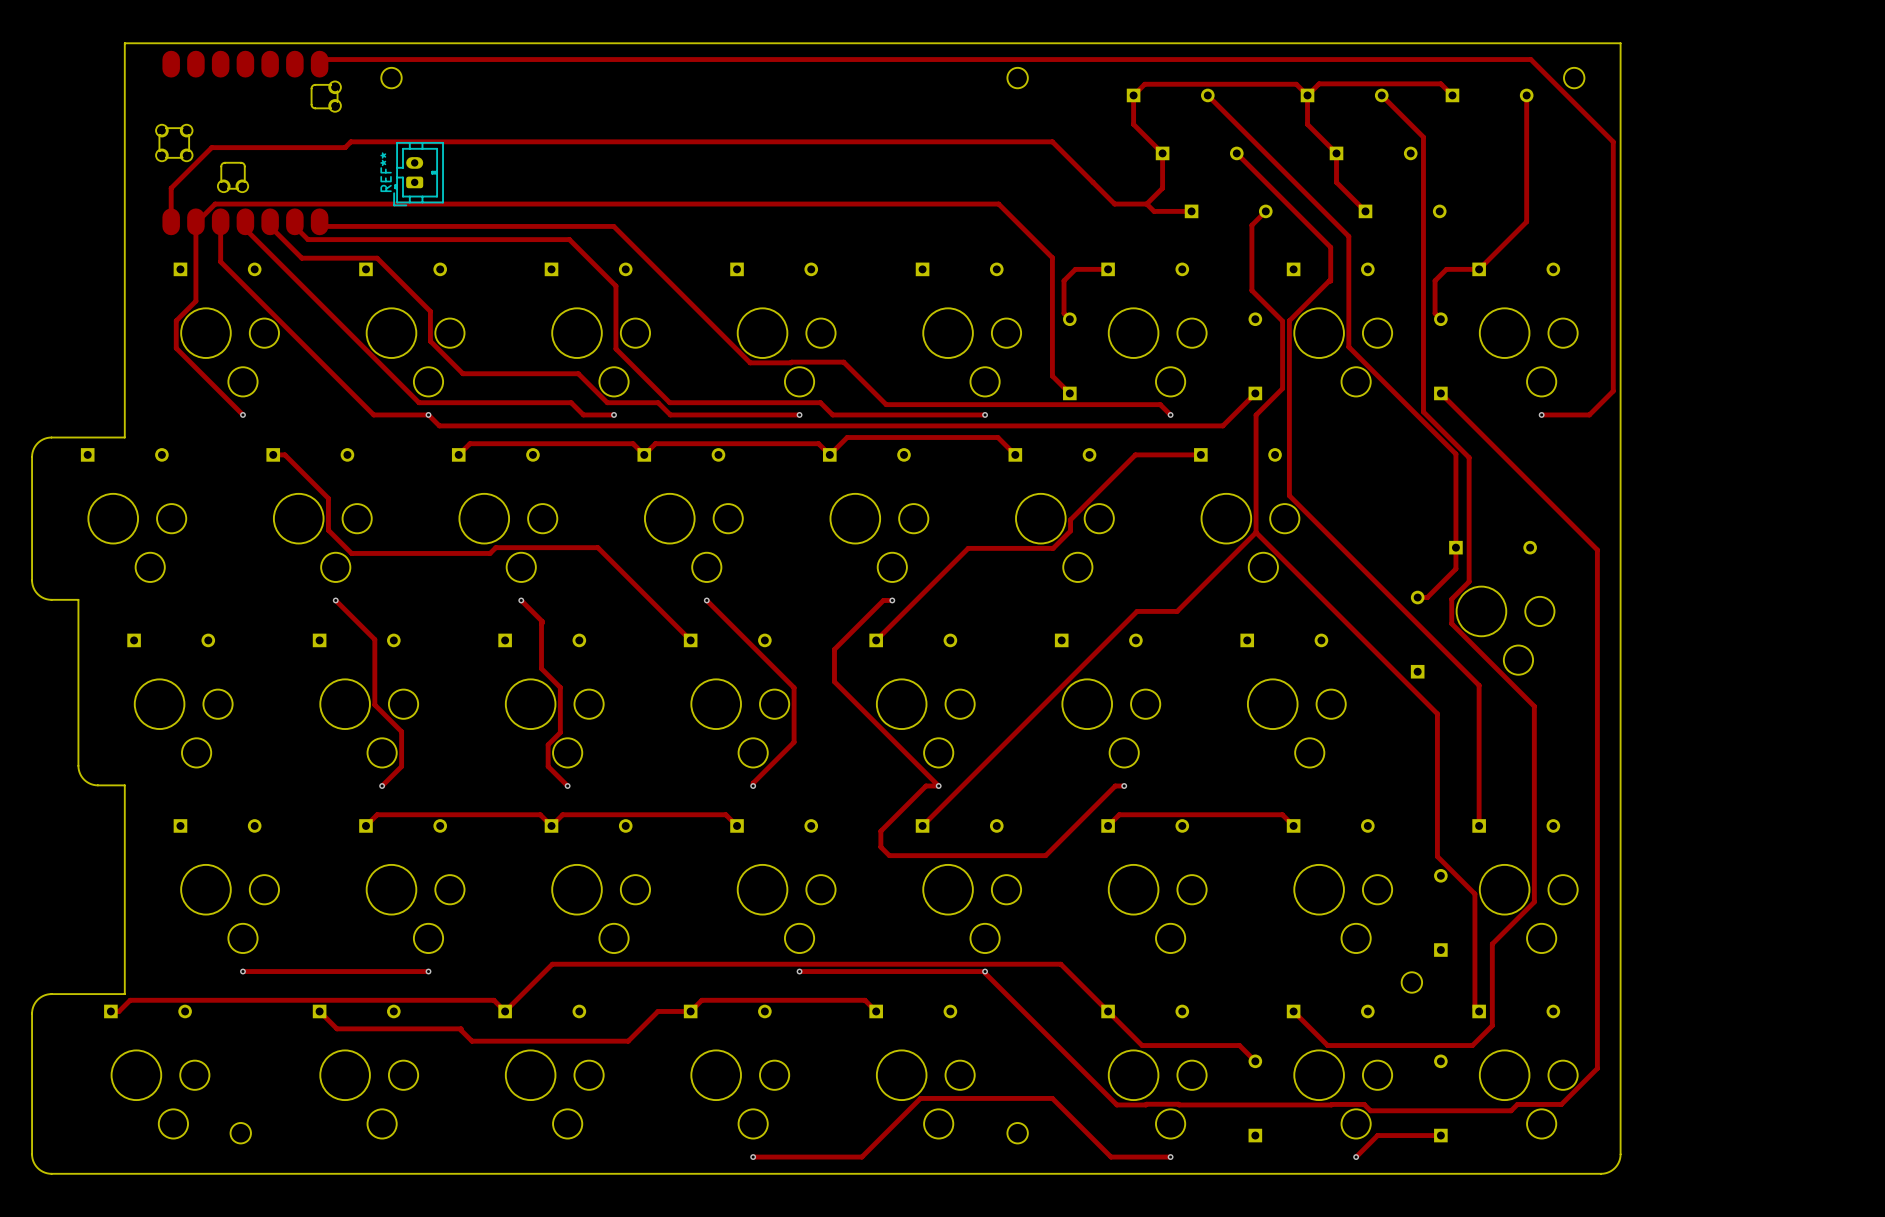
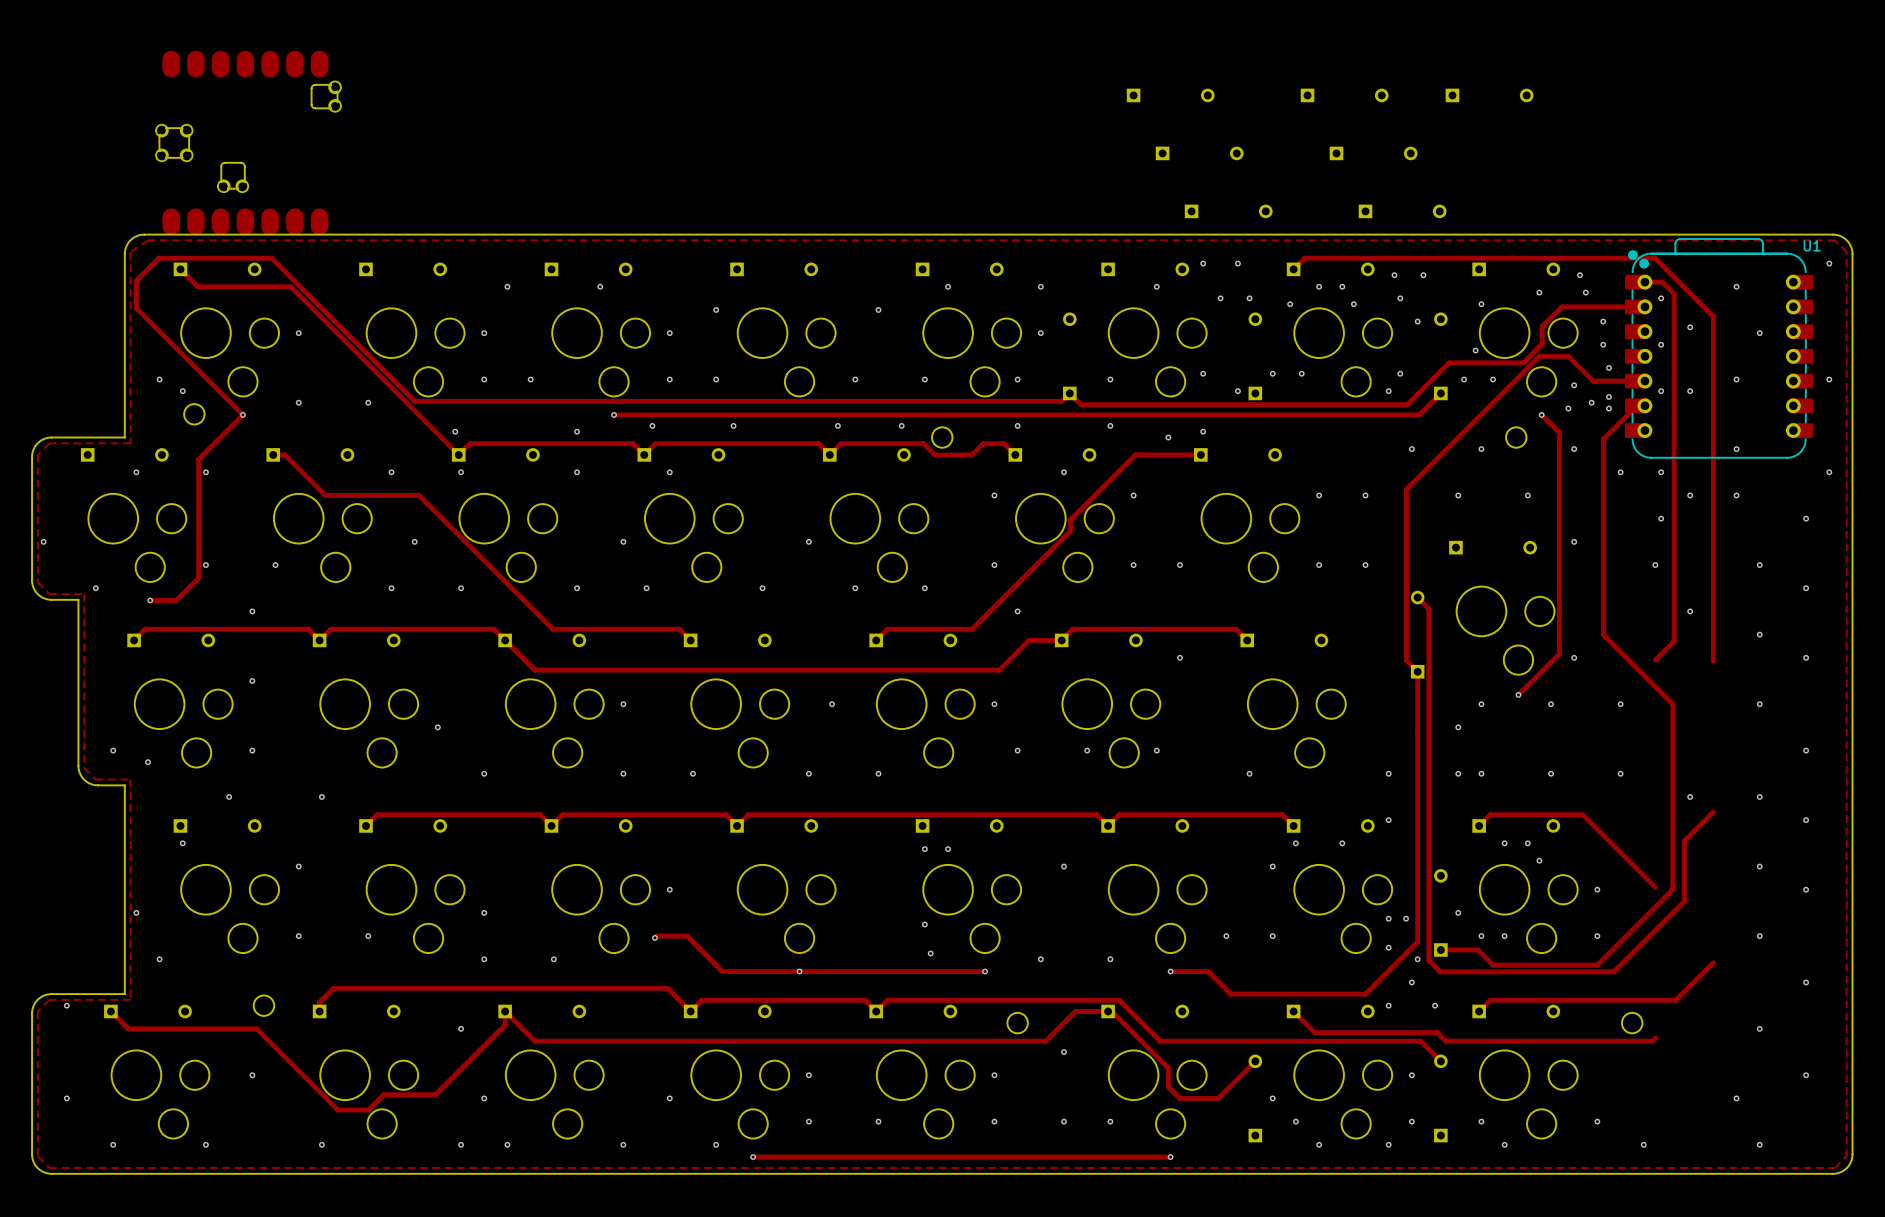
track: (319, 59) (1530, 59) (1613, 141) (1613, 391) (1589, 414) (1541, 414) -> (1518, 694) (1559, 654) (1559, 432) (1541, 414)
round board edge: [381, 67, 402, 89] -> none
round board edge: [1007, 67, 1029, 89] -> none
round board edge: [1563, 67, 1585, 89] -> none
track: (1207, 95) (1348, 236) (1348, 346) (1455, 454) (1455, 568) (1427, 597) (1417, 597) -> (1713, 812) (1684, 841) (1684, 901) (1613, 971) (1440, 971) (1428, 960) (1428, 608) (1417, 597)
track: (1307, 95) (1319, 83) (1440, 83) (1452, 95) -> none
track: (1307, 95) (1296, 84) (1144, 84) (1133, 95) (1133, 124) (1162, 153) (1162, 188) (1146, 204) -> none
track: (1307, 95) (1307, 124) (1336, 153) (1336, 182) (1365, 211) -> none
track: (1381, 95) (1423, 137) (1423, 411) (1469, 457) (1469, 581) (1451, 599) (1451, 623) (1534, 706) (1534, 902) (1492, 944) (1492, 1025) (1472, 1045) (1327, 1045) (1314, 1032) -> (1655, 1038) (1652, 1041) (1445, 1041) (1437, 1032) (1314, 1032)
track: (1526, 95) (1526, 221) (1479, 269) (1446, 269) (1435, 280) (1435, 313) (1440, 319) -> none
track: (1236, 153) (1330, 247) (1330, 280) (1289, 320) (1289, 495) (1479, 685) (1479, 825) -> (1655, 887) (1582, 814) (1490, 814) (1479, 825)
REF**: (418, 174) -> none
track: (1146, 204) (1154, 211) (1191, 211) -> none
track: (1146, 204) (1114, 204) (1052, 141) (350, 141) (345, 147) (211, 147) (171, 188) (171, 226) -> none
track: (1265, 211) (1251, 225) (1251, 290) (1282, 321) (1282, 388) (1256, 415) (1256, 532) -> none
track: (220, 226) (220, 261) (373, 414) (428, 414) (439, 425) (1222, 425) (1255, 393) -> none
track: (245, 226) (245, 229) (419, 402) (571, 402) (583, 414) (614, 414) -> none
track: (270, 226) (301, 258) (377, 258) (430, 311) (430, 341) (462, 373) (578, 373) (607, 402) (658, 402) (670, 414) -> (614, 414) (670, 414)
track: (294, 226) (308, 239) (569, 239) (615, 286) (615, 348) (669, 402) (820, 402) (832, 414) -> (799, 414) (832, 414)
track: (319, 226) (613, 226) (750, 362) (843, 362) (886, 404) (1081, 404) -> none
zone outline: none -> (147, 240) (1835, 240) (1846, 251) (1846, 1156) (1835, 1168) (49, 1168) (37, 1156) (37, 1011) (49, 999) (130, 999) (130, 779) (95, 779) (84, 767) (84, 594) (49, 594) (37, 582) (37, 454) (49, 443) (130, 443) (130, 251) (147, 240)
board edge: (124, 254) (124, 43) (1620, 43) (1620, 1154) (1614, 1168) (1601, 1173) -> (124, 254) (130, 240) (144, 234) (1833, 234) (1843, 237) (1850, 245) (1852, 254) (1852, 1158) (1845, 1169) (1835, 1173) (1601, 1173)
via: none -> (1203, 263)
via: none -> (1237, 263)
via: none -> (1829, 263)
track: none -> (180, 269) (197, 286) (290, 286) (458, 454)
track: (1108, 269) (1075, 269) (1064, 280) (1064, 313) (1069, 319) -> none
track: none -> (1293, 269) (1304, 258) (1655, 258) (1713, 316) (1713, 661)
via: none -> (1394, 275)
via: none -> (1423, 275)
via: none -> (1580, 275)
track: none -> (1644, 282) (1662, 282) (1674, 293) (1674, 641) (1655, 660)
via: none -> (507, 286)
via: none -> (600, 286)
via: none -> (948, 286)
via: none -> (1040, 286)
via: none -> (1156, 286)
via: none -> (1319, 286)
via: none -> (1342, 286)
via: none -> (1736, 286)
via: none -> (1539, 292)
via: none -> (1585, 292)
via: none -> (1220, 298)
via: none -> (1249, 298)
via: none -> (1400, 298)
via: none -> (1661, 298)
via: none -> (1290, 304)
via: none -> (1353, 304)
via: none -> (1481, 304)
via: none -> (716, 309)
via: none -> (878, 309)
via: none -> (1417, 321)
via: none -> (1603, 321)
via: none -> (1690, 327)
via: none -> (298, 333)
via: none -> (484, 333)
via: none -> (669, 333)
via: none -> (1040, 333)
via: none -> (1759, 333)
via: none -> (1603, 344)
via: none -> (1661, 344)
track: (176, 348) (176, 320) (195, 301) (195, 223) (215, 204) (998, 204) (1052, 257) (1052, 376) (1069, 393) -> (176, 348) (136, 308) (136, 280) (158, 258) (271, 258) (414, 401) (1061, 401) (1069, 393) (1081, 404)
U1: none -> (1719, 348)
via: none -> (1475, 350)
via: none -> (1609, 367)
via: none -> (1203, 373)
via: none -> (1272, 373)
via: none -> (1301, 373)
via: none -> (1400, 373)
via: none -> (159, 379)
via: none -> (484, 379)
via: none -> (530, 379)
via: none -> (669, 379)
via: none -> (716, 379)
via: none -> (855, 379)
via: none -> (924, 379)
via: none -> (1017, 379)
via: none -> (1110, 379)
via: none -> (1464, 379)
via: none -> (1493, 379)
via: none -> (1736, 379)
via: none -> (1829, 379)
track: none -> (1636, 381) (1593, 381) (1568, 356) (1539, 356) (1406, 489) (1406, 660) (1417, 671) (1417, 941) (1365, 994) (1230, 994) (1208, 971) (1170, 971)
via: none -> (1574, 385)
via: none -> (182, 391)
via: none -> (1237, 391)
via: none -> (1388, 391)
via: none -> (1661, 391)
via: none -> (1690, 391)
track: (1440, 393) (1597, 549) (1597, 1068) (1561, 1104) (1517, 1104) (1511, 1110) (1370, 1110) (1364, 1104) (1116, 1104) (985, 971) -> (1440, 393) (1419, 414) (985, 414)
via: none -> (1609, 396)
via: none -> (298, 402)
via: none -> (368, 402)
via: none -> (1591, 402)
round board edge: none -> [183, 403, 205, 425]
track: (1160, 404) (1170, 414) -> (1160, 404) (1407, 404) (1449, 362) (1523, 362) (1542, 343) (1542, 326) (1561, 306) (1636, 306)
track: none -> (1636, 405) (1603, 439) (1603, 635) (1672, 704) (1672, 889) (1597, 965) (1493, 965) (1477, 950) (1440, 950)
via: none -> (1568, 408)
via: none -> (1609, 408)
track: none -> (242, 414) (198, 459) (198, 578) (176, 600) (150, 600)
via: (428, 414) -> none
via: (799, 414) -> none
via: (985, 414) -> none
via: (1170, 414) -> none
via: none -> (652, 425)
via: none -> (733, 425)
via: none -> (837, 425)
via: none -> (901, 425)
via: none -> (1017, 425)
via: none -> (1110, 425)
round board edge: none -> [931, 427, 953, 448]
round board edge: none -> [1505, 427, 1527, 448]
via: none -> (455, 431)
via: none -> (577, 431)
via: none -> (1203, 431)
via: none -> (1168, 437)
track: (840, 443) (847, 437) (997, 437) (1004, 443) -> (840, 443) (923, 443) (935, 455) (971, 455) (983, 443) (1004, 443)
via: none -> (1411, 449)
via: none -> (1481, 449)
via: none -> (1574, 449)
via: none -> (1736, 449)
via: none -> (136, 472)
via: none -> (205, 472)
via: none -> (391, 472)
via: none -> (461, 472)
via: none -> (577, 472)
via: none -> (669, 472)
via: none -> (1064, 472)
via: none -> (1620, 472)
via: none -> (1661, 472)
via: none -> (1829, 472)
track: (325, 495) (328, 498) (328, 530) (351, 553) (490, 553) (495, 547) (597, 547) (679, 629) -> (325, 495) (419, 495) (552, 629) (679, 629)
via: none -> (994, 495)
via: none -> (1133, 495)
via: none -> (1319, 495)
via: none -> (1365, 495)
via: none -> (1458, 495)
via: none -> (1527, 495)
via: none -> (1690, 495)
via: none -> (1736, 495)
via: none -> (1661, 518)
via: none -> (1806, 518)
track: (1256, 532) (1437, 713) (1437, 856) (1474, 894) (1474, 1007) (1479, 1011) -> (1713, 962) (1675, 1000) (1490, 1000) (1479, 1011)
track: (1256, 532) (1177, 611) (1137, 611) (922, 825) -> none
via: none -> (43, 541)
via: none -> (414, 541)
via: none -> (623, 541)
via: none -> (808, 541)
via: none -> (1574, 541)
track: (1053, 548) (968, 548) (887, 629) -> (1053, 548) (972, 629) (887, 629)
via: none -> (205, 565)
via: none -> (275, 565)
via: none -> (994, 565)
via: none -> (1133, 565)
via: none -> (1179, 565)
via: none -> (1319, 565)
via: none -> (1365, 565)
via: none -> (1655, 565)
via: none -> (1759, 565)
via: none -> (95, 588)
via: none -> (391, 588)
via: none -> (461, 588)
via: none -> (577, 588)
via: none -> (646, 588)
via: none -> (762, 588)
via: none -> (855, 588)
via: none -> (924, 588)
via: none -> (1806, 588)
via: none -> (150, 600)
track: (335, 600) (374, 639) (374, 704) (401, 731) (401, 766) (382, 786) -> none
via: (335, 600) -> none
track: (521, 600) (542, 621) (541, 668) (560, 687) (560, 732) (548, 744) (548, 766) (567, 786) -> none
via: (521, 600) -> none
track: (706, 600) (794, 687) (794, 742) (753, 783) (753, 786) -> none
via: (706, 600) -> none
track: (892, 600) (883, 600) (834, 649) (834, 681) (938, 786) (926, 786) (880, 831) (880, 847) (889, 855) (1045, 855) (1115, 786) (1124, 786) -> none
via: (892, 600) -> none
via: none -> (252, 611)
via: none -> (1017, 611)
via: none -> (1690, 611)
via: none -> (1759, 634)
track: none -> (134, 640) (145, 629) (308, 629) (319, 640) (330, 629) (493, 629) (534, 670) (999, 670) (1029, 640) (1061, 640) (1072, 629) (1236, 629) (1247, 640)
via: none -> (1179, 657)
via: none -> (1574, 657)
via: none -> (1806, 657)
via: none -> (252, 681)
via: none -> (1518, 694)
via: none -> (623, 704)
via: none -> (832, 704)
via: none -> (994, 704)
via: none -> (1481, 704)
via: none -> (1551, 704)
via: none -> (1620, 704)
via: none -> (1759, 704)
via: none -> (437, 727)
via: none -> (1458, 727)
via: none -> (113, 750)
via: none -> (252, 750)
via: none -> (1017, 750)
via: none -> (1087, 750)
via: none -> (1156, 750)
via: none -> (1806, 750)
via: none -> (147, 762)
via: none -> (484, 773)
via: none -> (623, 773)
via: none -> (692, 773)
via: none -> (808, 773)
via: none -> (878, 773)
via: none -> (1249, 773)
via: none -> (1388, 773)
via: none -> (1458, 773)
via: none -> (1481, 773)
via: none -> (1551, 773)
via: none -> (1620, 773)
via: (382, 786) -> none
via: (567, 786) -> none
via: (753, 786) -> none
via: (938, 786) -> none
via: (1124, 786) -> none
via: none -> (229, 796)
via: none -> (321, 796)
via: none -> (1690, 796)
via: none -> (1759, 796)
via: none -> (1388, 820)
via: none -> (1806, 820)
track: none -> (737, 825) (748, 814) (1096, 814) (1108, 825)
via: none -> (182, 843)
via: none -> (1295, 843)
via: none -> (1342, 843)
via: none -> (1504, 843)
via: none -> (1527, 843)
via: none -> (924, 849)
via: none -> (948, 849)
via: none -> (1539, 860)
via: none -> (298, 866)
via: none -> (1064, 866)
via: none -> (1272, 866)
via: none -> (1759, 866)
via: none -> (669, 889)
via: none -> (1597, 889)
via: none -> (1806, 889)
via: none -> (136, 912)
via: none -> (484, 912)
via: none -> (1458, 912)
via: none -> (1388, 918)
via: none -> (1406, 918)
via: none -> (924, 924)
via: none -> (298, 936)
via: none -> (368, 936)
via: none -> (1226, 936)
via: none -> (1272, 936)
via: none -> (1481, 936)
via: none -> (1504, 936)
via: none -> (1597, 936)
via: none -> (1759, 936)
track: none -> (654, 937) (656, 936) (687, 936) (722, 971) (799, 971)
via: none -> (654, 937)
via: none -> (1388, 947)
via: none -> (930, 953)
via: none -> (159, 959)
via: none -> (484, 959)
via: none -> (553, 959)
via: none -> (1040, 959)
via: none -> (1110, 959)
via: none -> (1417, 959)
track: (242, 971) (428, 971) -> none
via: (242, 971) -> none
via: (428, 971) -> none
via: none -> (1170, 971)
round board edge: [1401, 972, 1423, 993] -> none
via: none -> (1411, 982)
via: none -> (1806, 982)
via: none -> (66, 1005)
via: none -> (1388, 1005)
via: none -> (1435, 1005)
track: (110, 1011) (119, 1011) (130, 1000) (493, 1000) (505, 1011) (552, 964) (1060, 964) (1142, 1045) (1239, 1045) (1255, 1061) -> (628, 1041) (1045, 1041) (1075, 1011) (1111, 1011) (1168, 1068) (1168, 1086) (1179, 1098) (1218, 1098) (1255, 1061)
track: none -> (110, 1011) (128, 1028) (256, 1028) (337, 1110) (368, 1110) (383, 1094) (435, 1094) (505, 1025) (505, 1011) (534, 1041)
track: (319, 1011) (337, 1028) (461, 1028) (471, 1041) (534, 1041) -> (319, 1011) (319, 1002) (333, 988) (667, 988) (690, 1011)
track: (690, 1011) (657, 1011) (628, 1041) -> none
track: none -> (876, 1011) (887, 1000) (1119, 1000) (1160, 1041) (1420, 1041) (1440, 1061)
round board edge: none -> [1621, 1012, 1643, 1034]
via: none -> (461, 1028)
via: none -> (1759, 1028)
via: none -> (1064, 1052)
via: none -> (252, 1075)
via: none -> (808, 1075)
via: none -> (994, 1075)
via: none -> (1411, 1075)
via: none -> (1806, 1075)
via: none -> (66, 1098)
via: none -> (484, 1098)
via: none -> (669, 1098)
via: none -> (1272, 1098)
via: none -> (1736, 1098)
via: none -> (808, 1121)
via: none -> (878, 1121)
via: none -> (994, 1121)
via: none -> (1064, 1121)
via: none -> (1110, 1121)
via: none -> (1295, 1121)
via: none -> (1411, 1121)
via: none -> (1481, 1121)
via: none -> (1597, 1121)
round board edge position: (240, 1133) -> (263, 1005)
round board edge position: (1017, 1133) -> (1017, 1023)
track: (1440, 1135) (1377, 1135) (1356, 1157) -> none
via: none -> (113, 1144)
via: none -> (205, 1144)
via: none -> (321, 1144)
via: none -> (461, 1144)
via: none -> (507, 1144)
via: none -> (623, 1144)
via: none -> (716, 1144)
via: none -> (1319, 1144)
via: none -> (1388, 1144)
via: none -> (1504, 1144)
via: none -> (1643, 1144)
via: none -> (1759, 1144)
track: (861, 1157) (920, 1098) (1052, 1098) (1111, 1157) -> (861, 1157) (1111, 1157)
via: (1356, 1157) -> none

